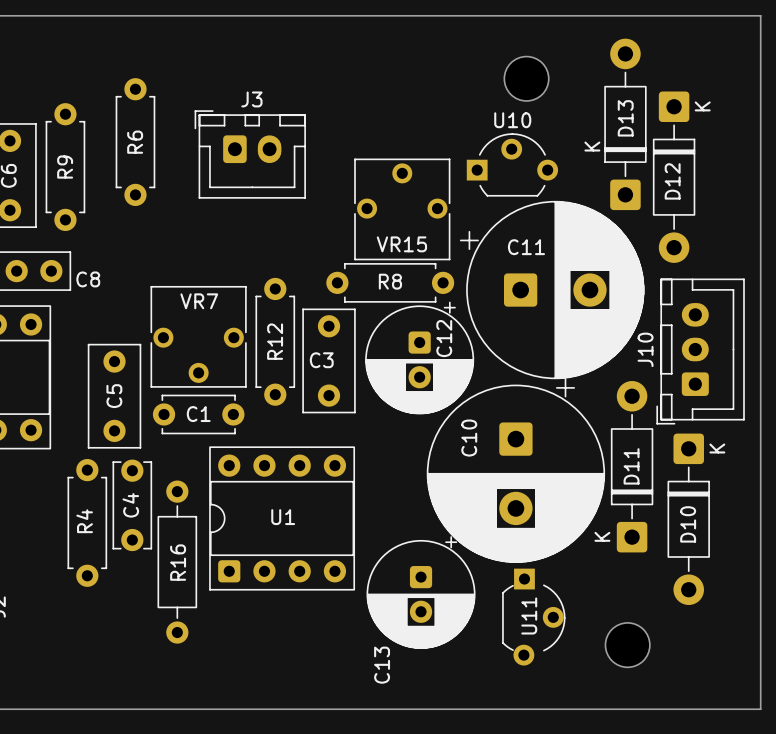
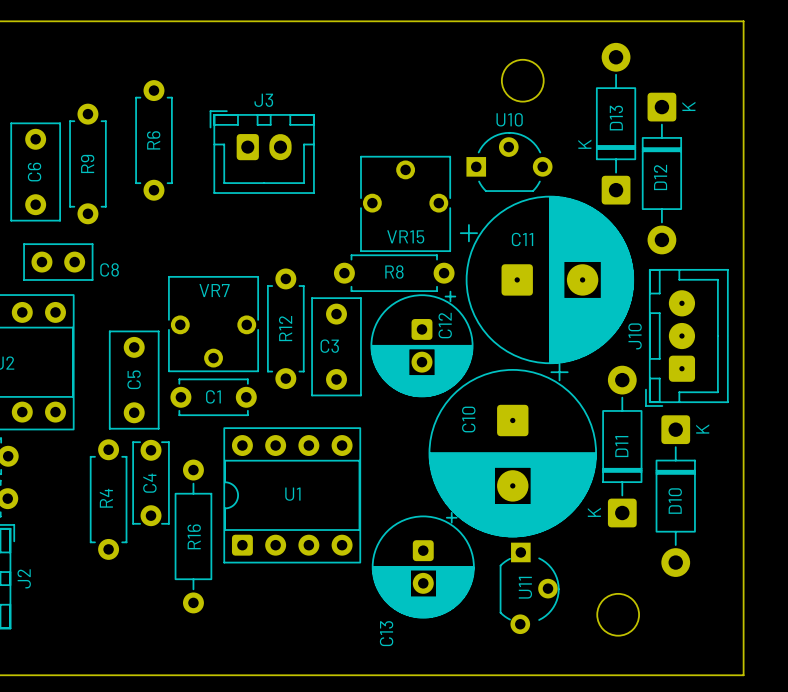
C11 footprint: [459, 200, 645, 380] -> [459, 195, 635, 365]
J10 footprint: [656, 278, 745, 425] -> [645, 269, 729, 407]
C10 footprint: [426, 378, 606, 563] -> [428, 363, 597, 538]

